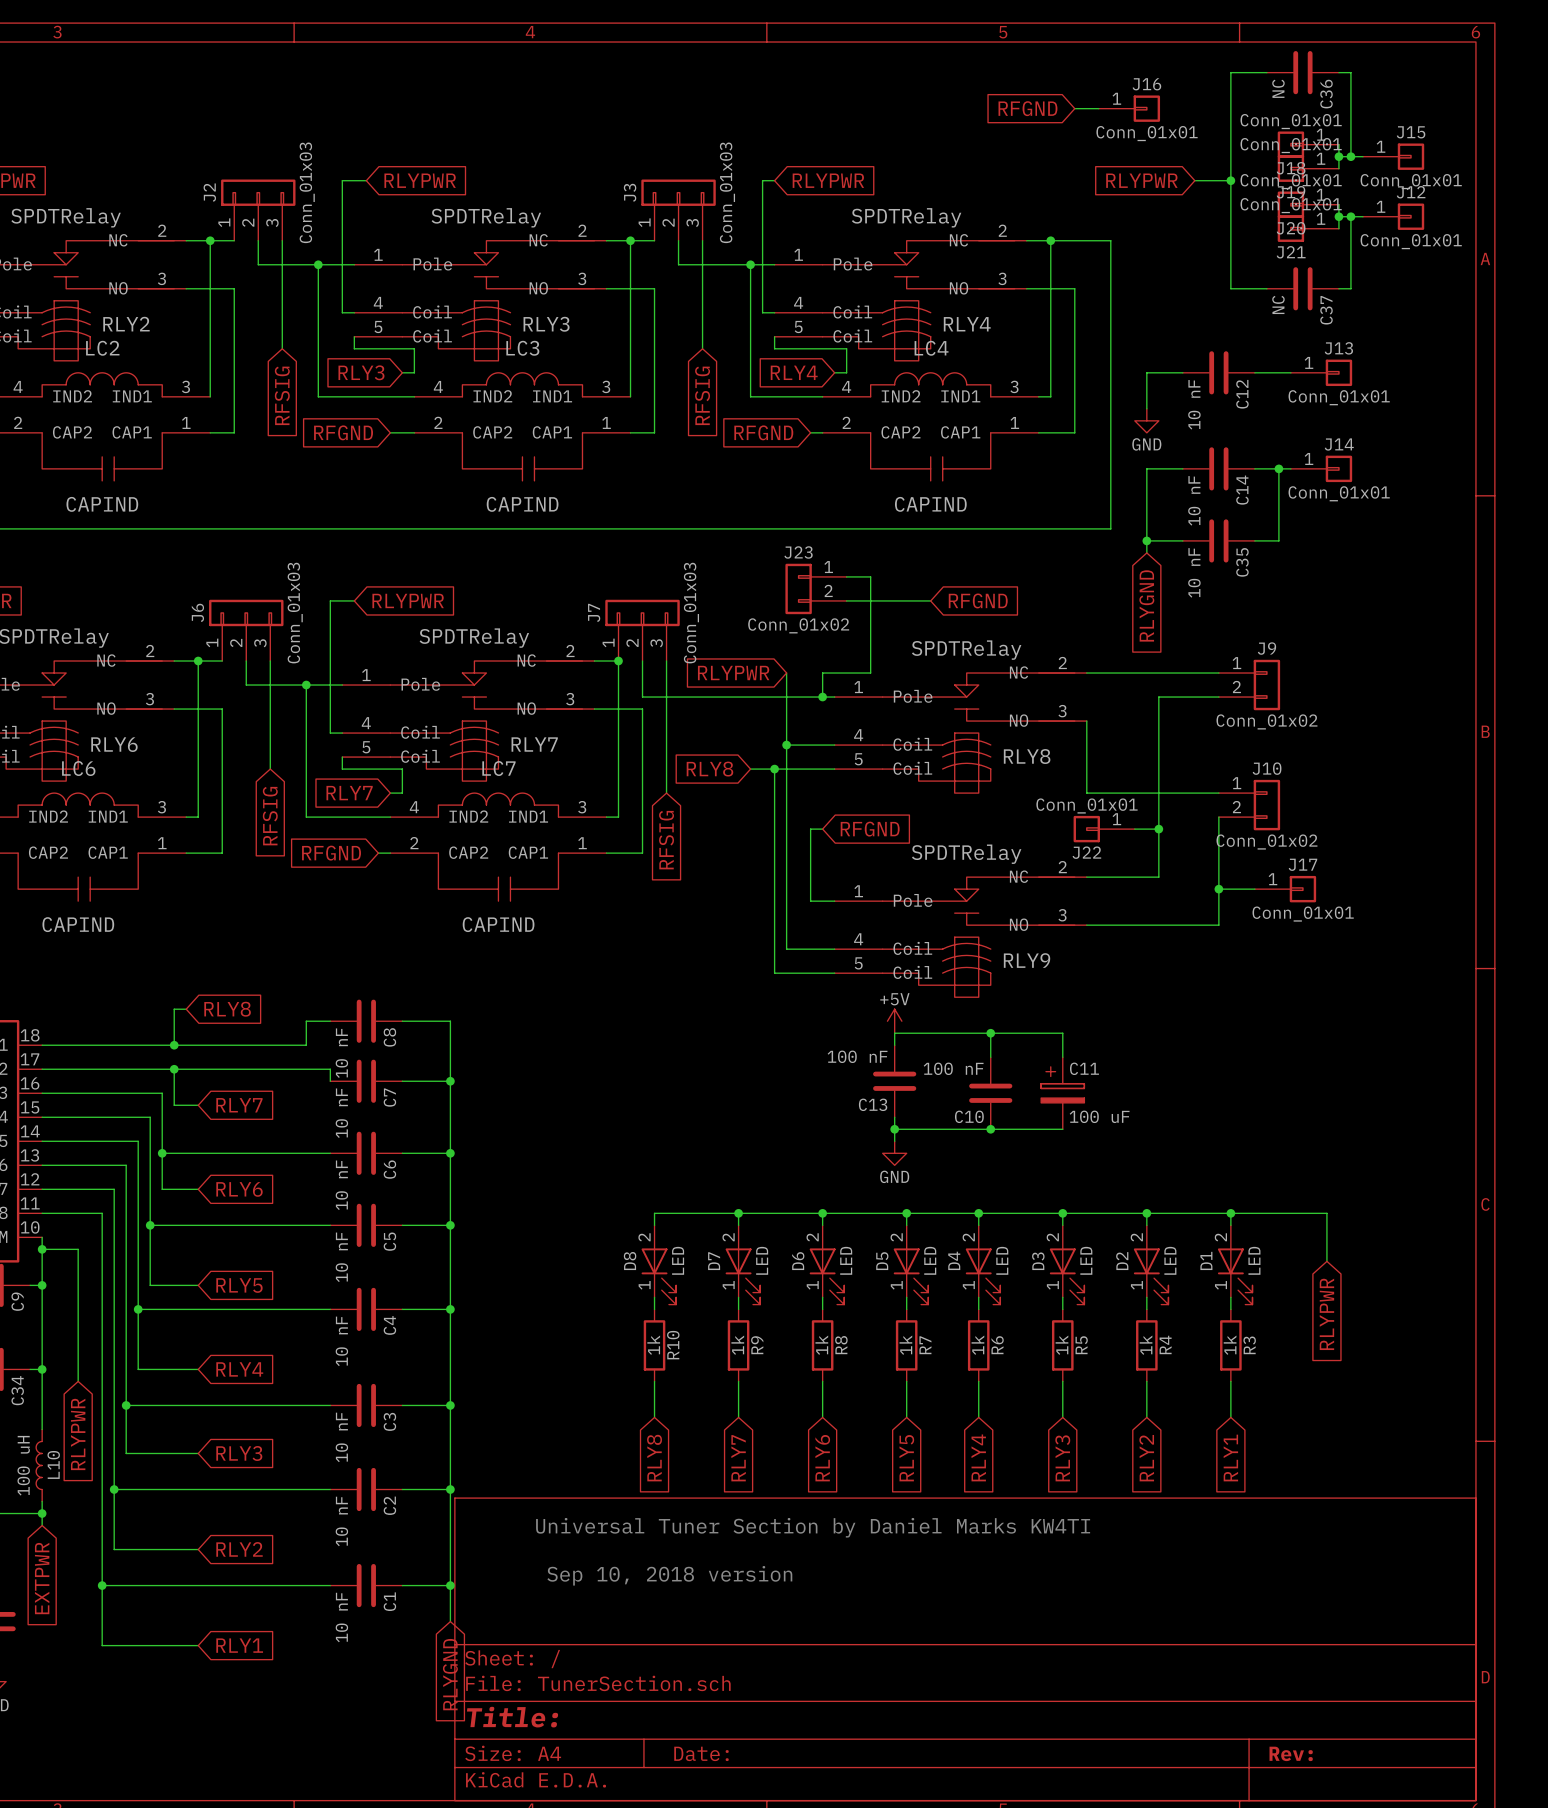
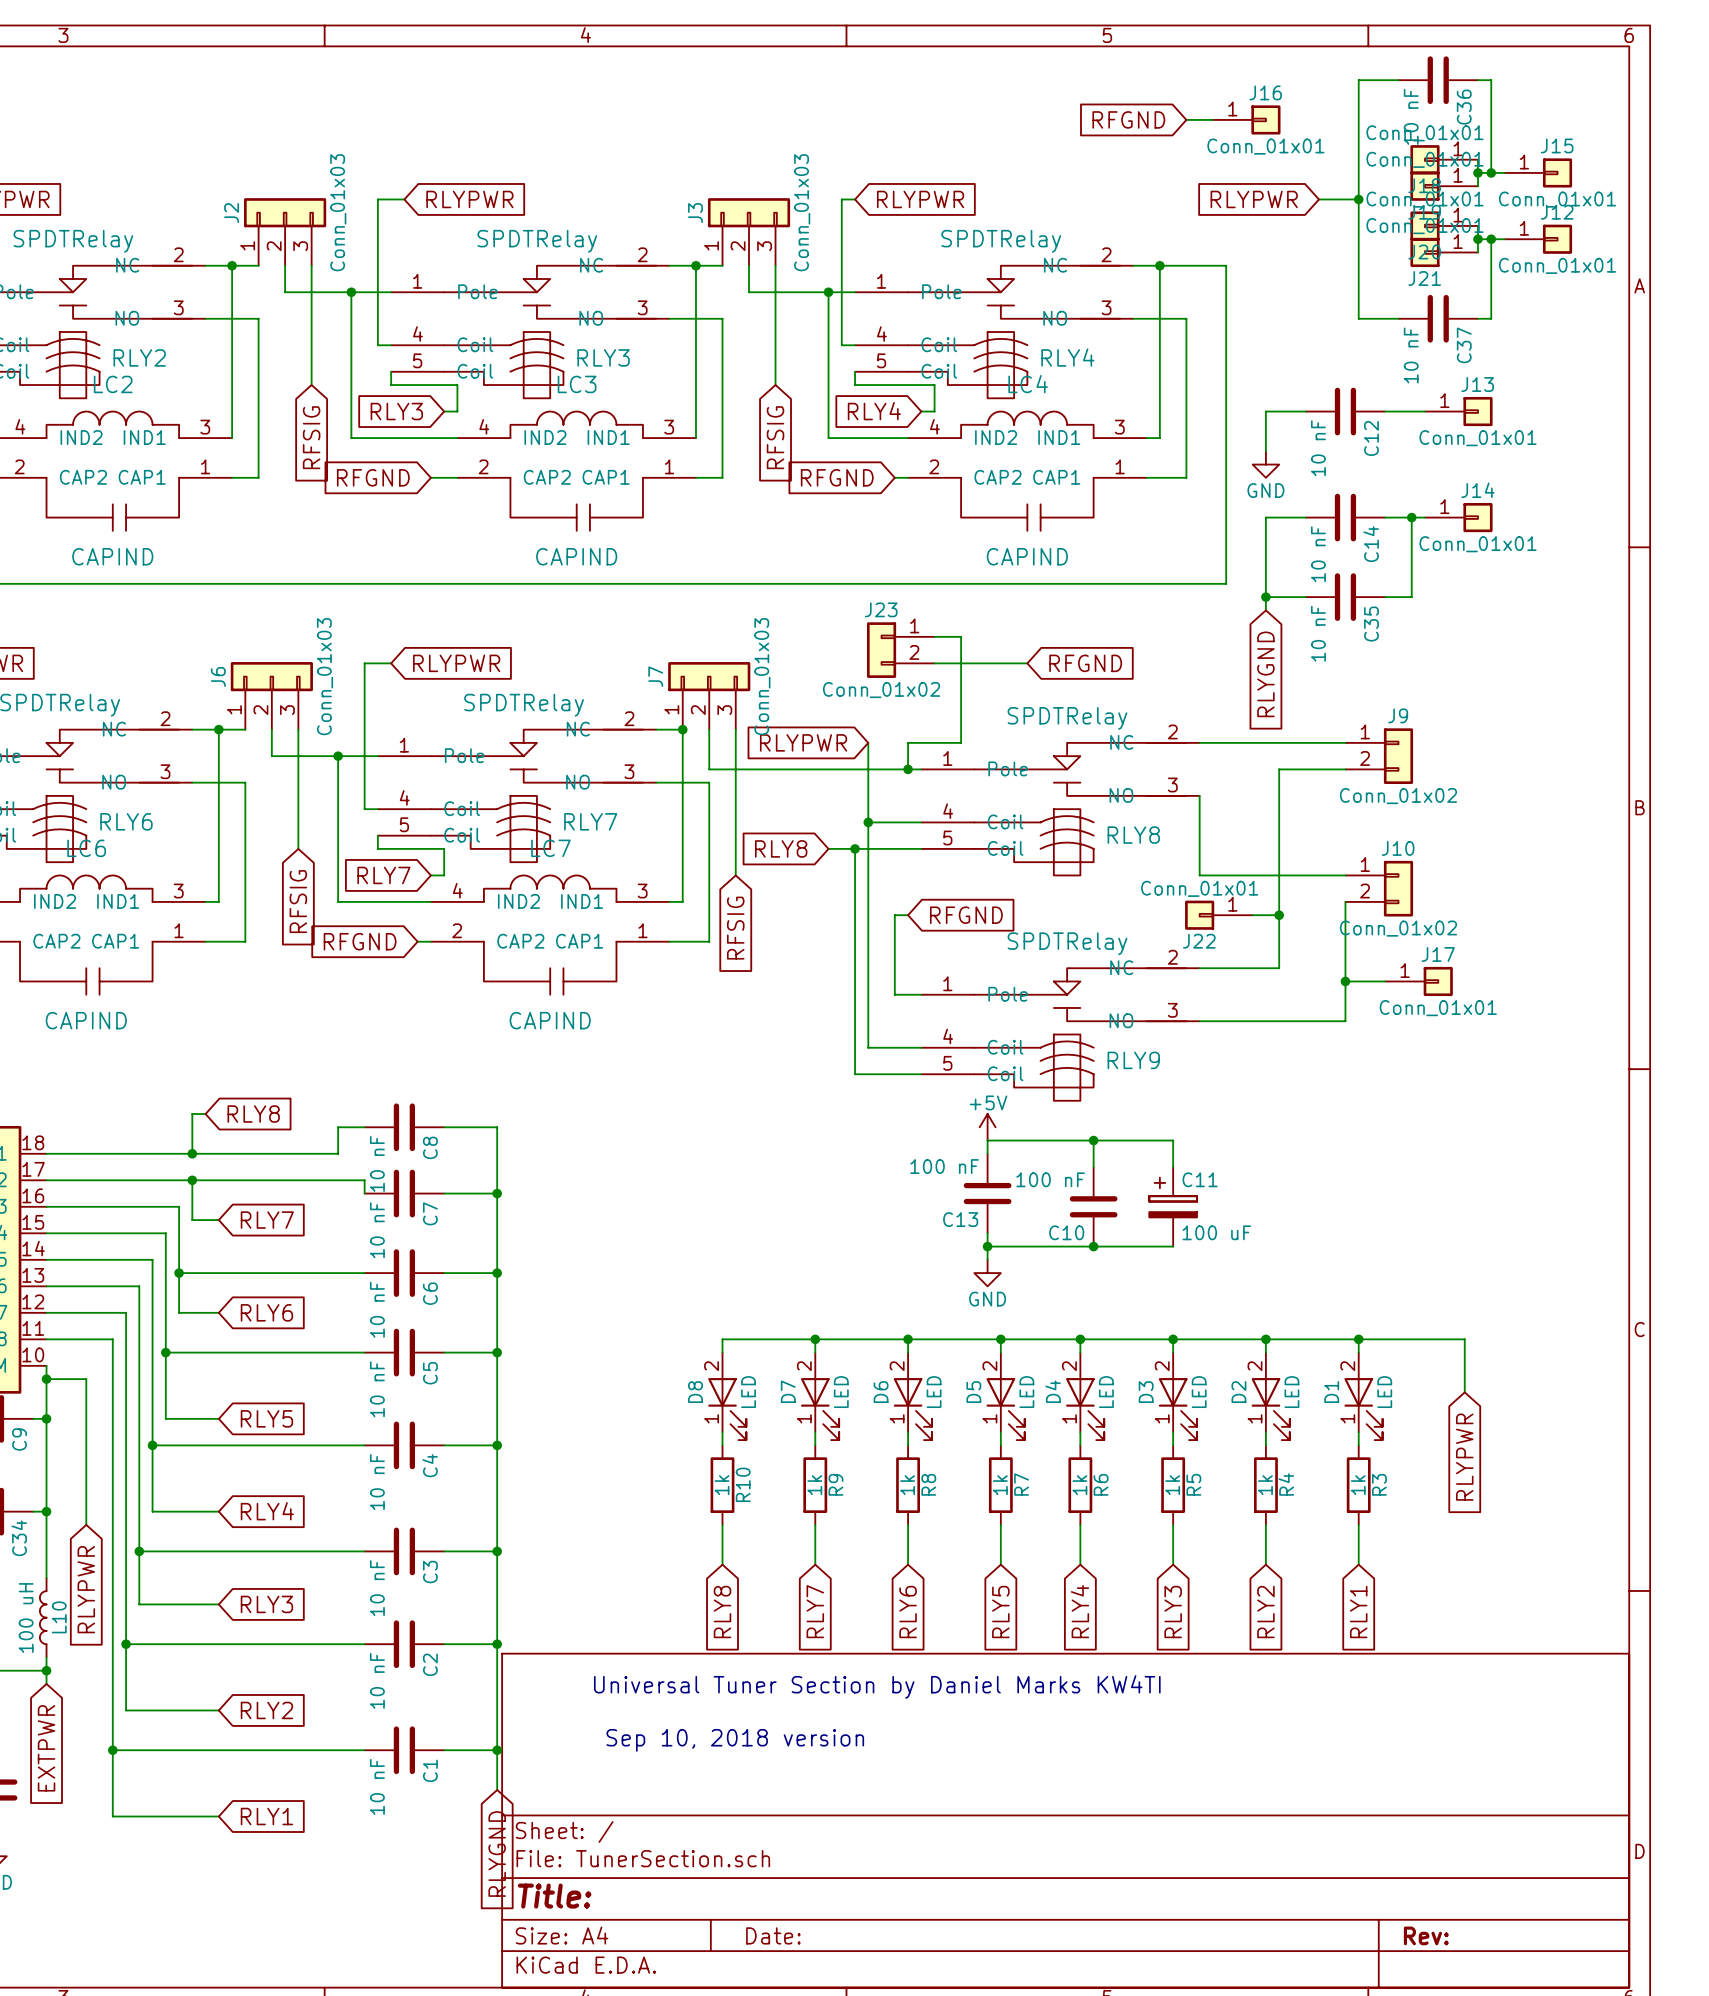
C36 value: NC (1278, 88) -> 10 nF (1411, 116)
C37 value: NC (1278, 304) -> 10 nF (1411, 355)

